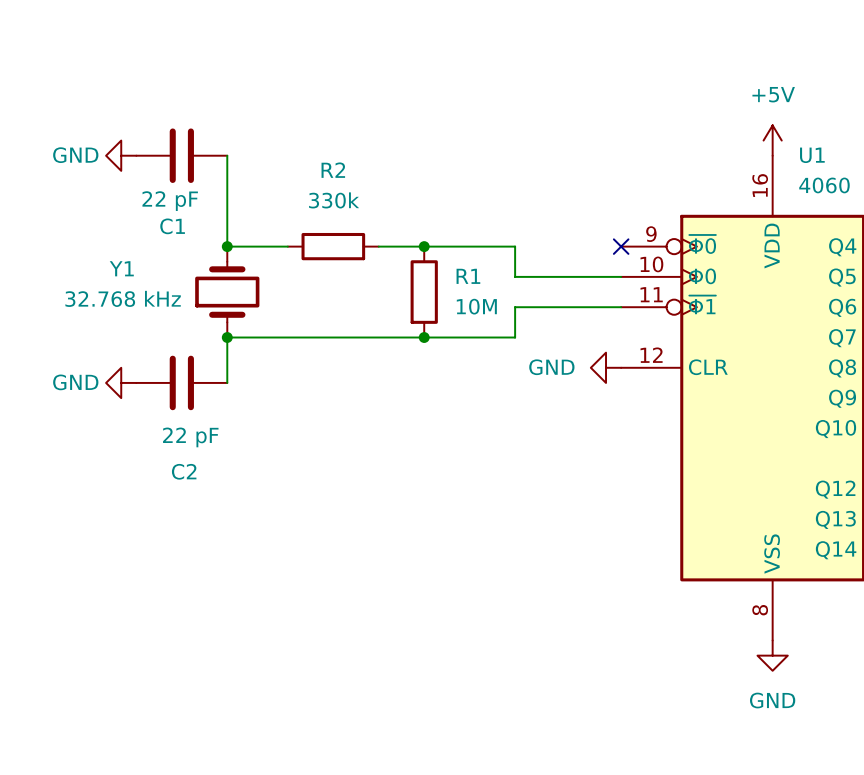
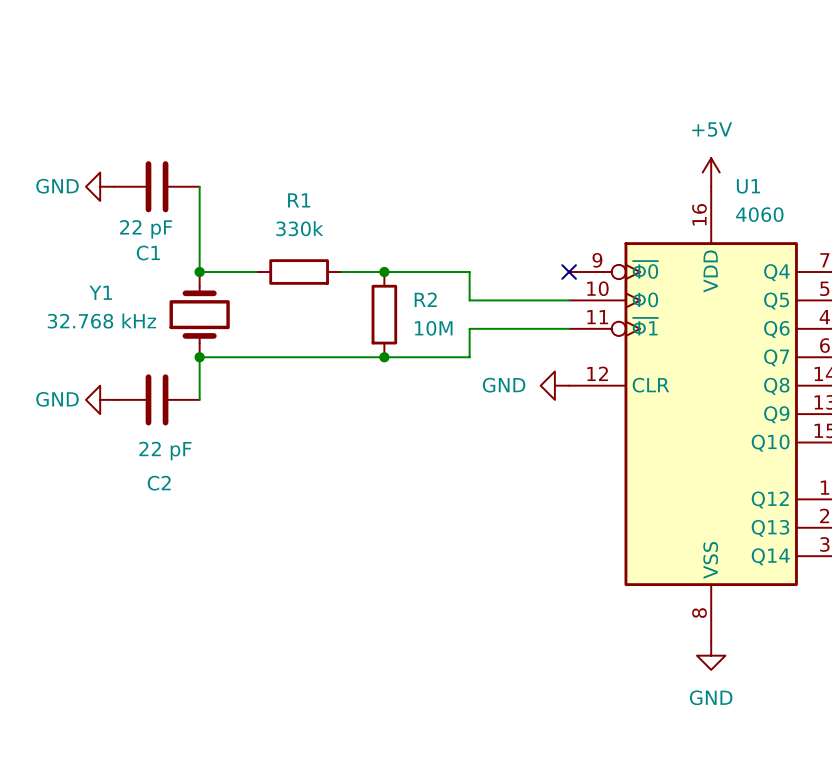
R2 name: R2 (333, 170) -> R1 (299, 200)
R1 name: R1 (468, 276) -> R2 (425, 299)

